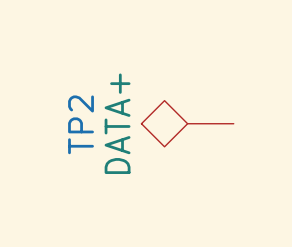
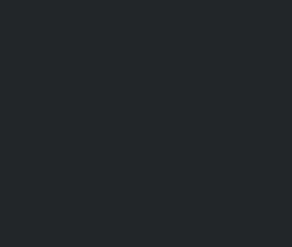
TP2: DATA+ (187, 123) -> none

